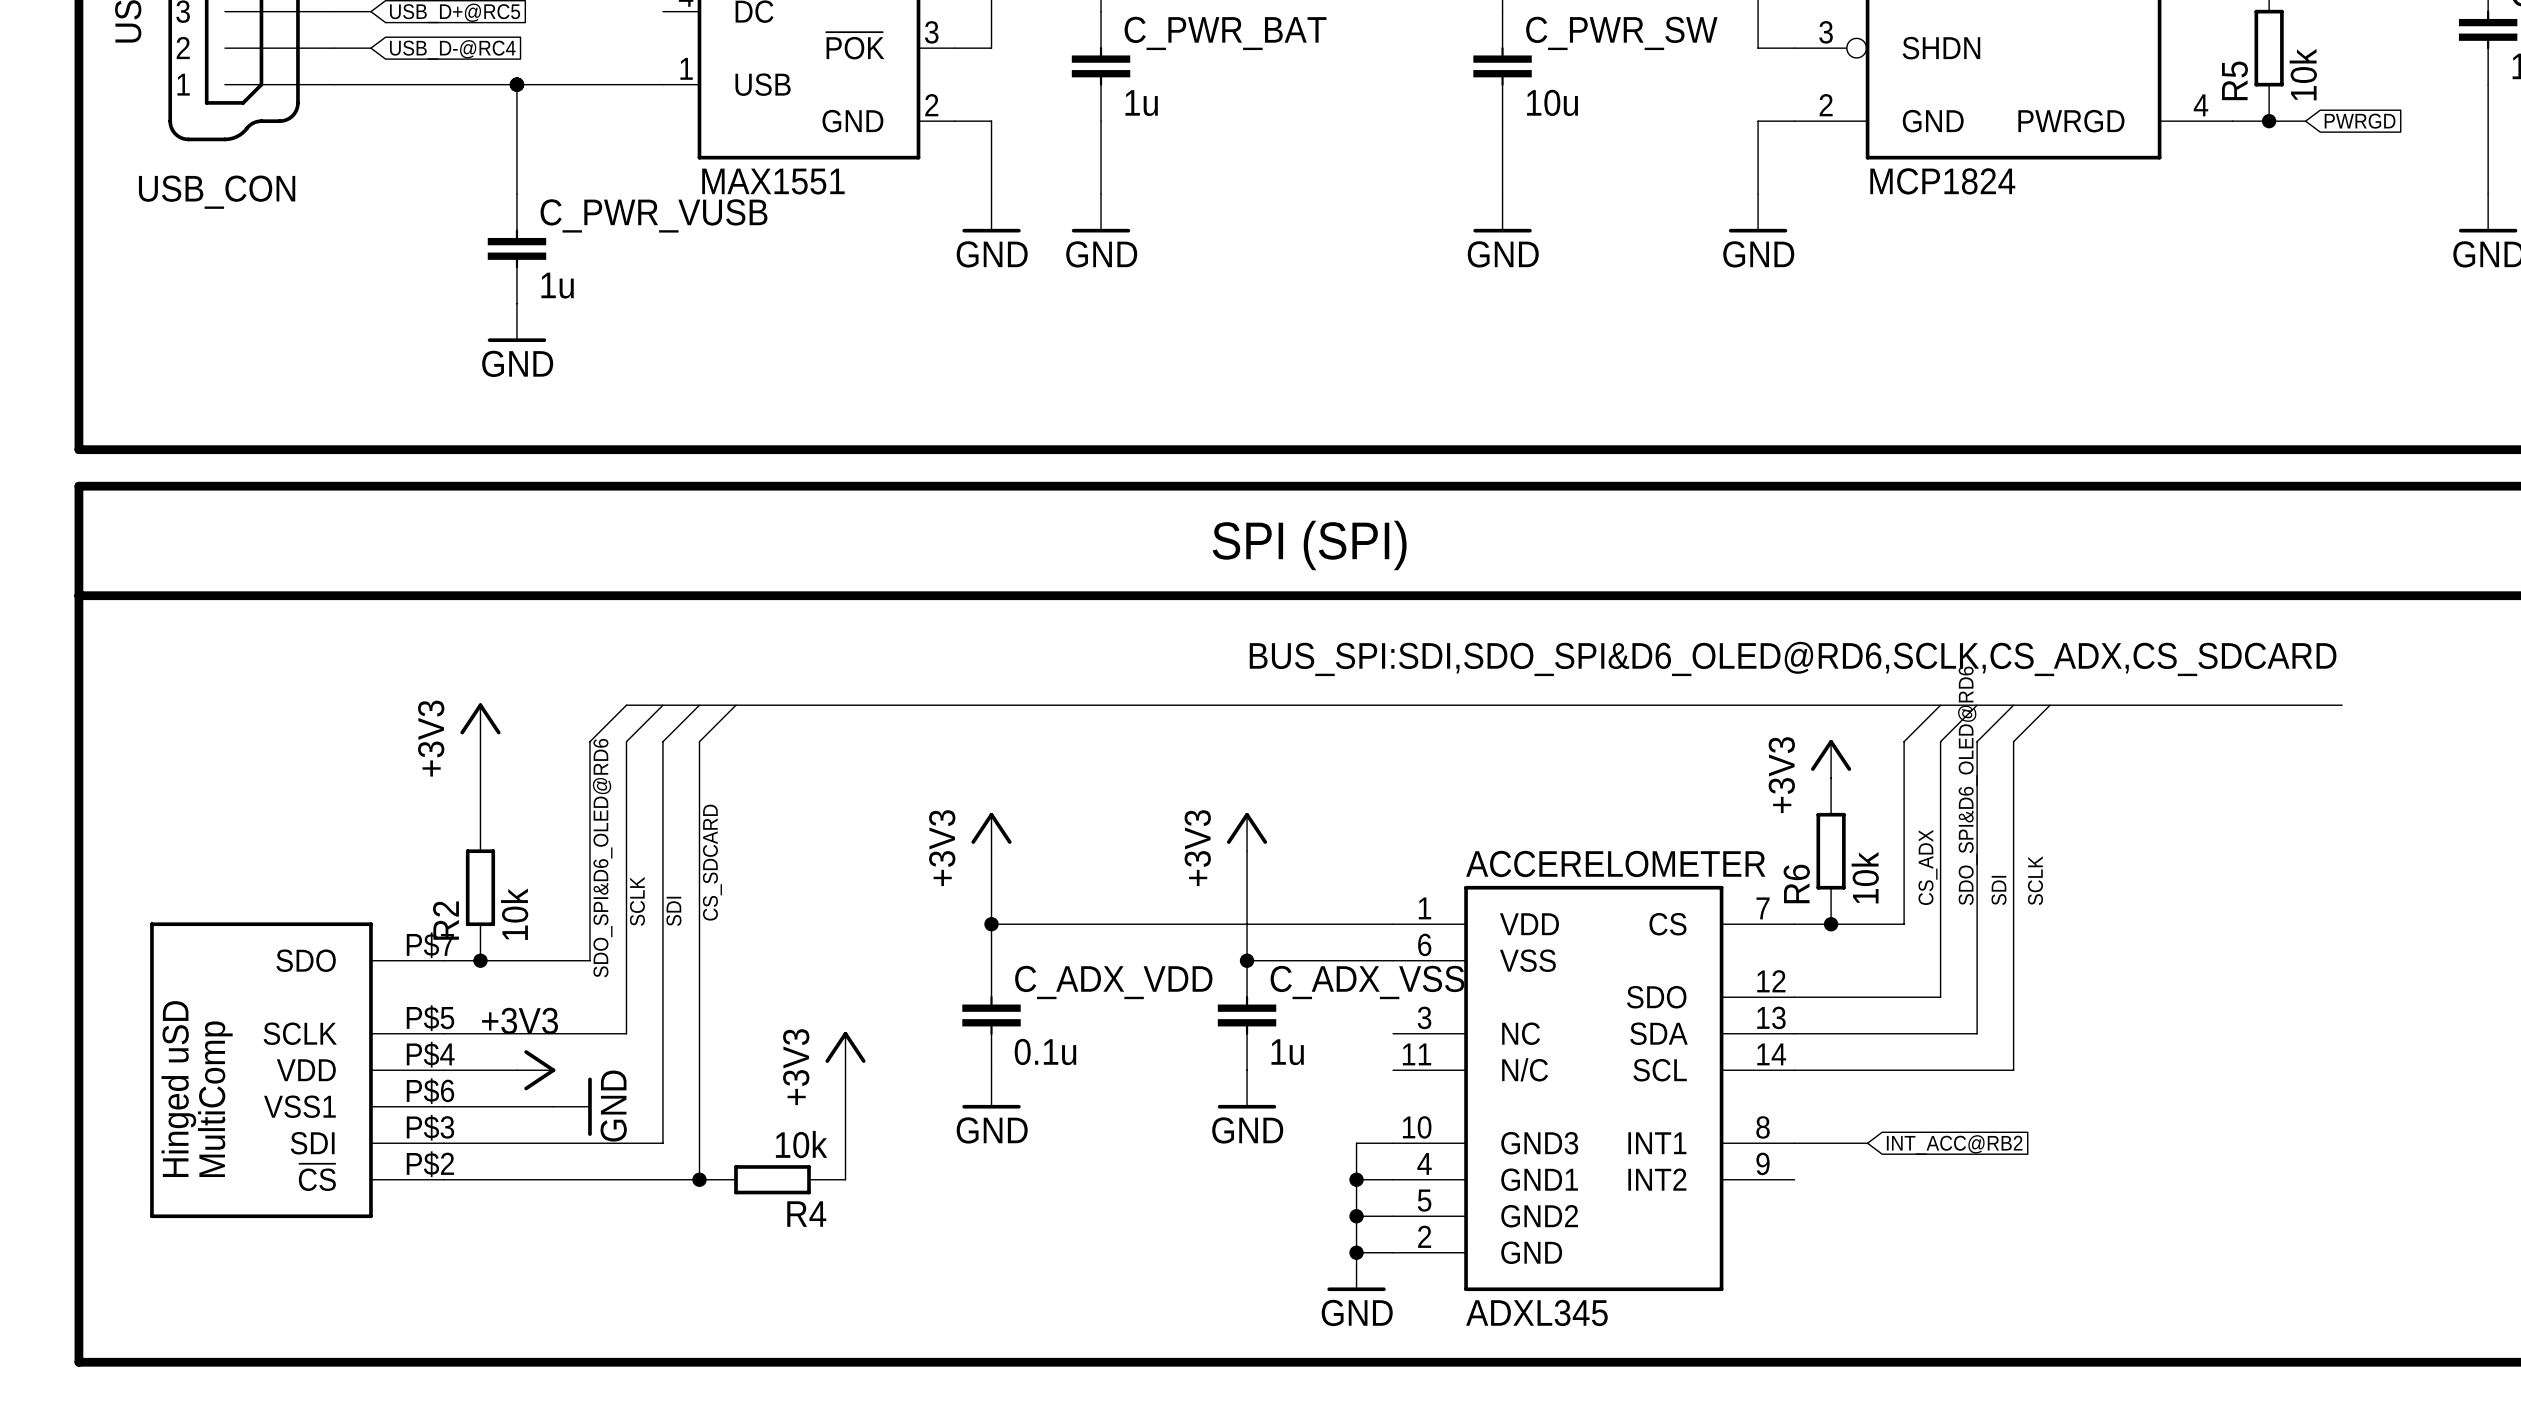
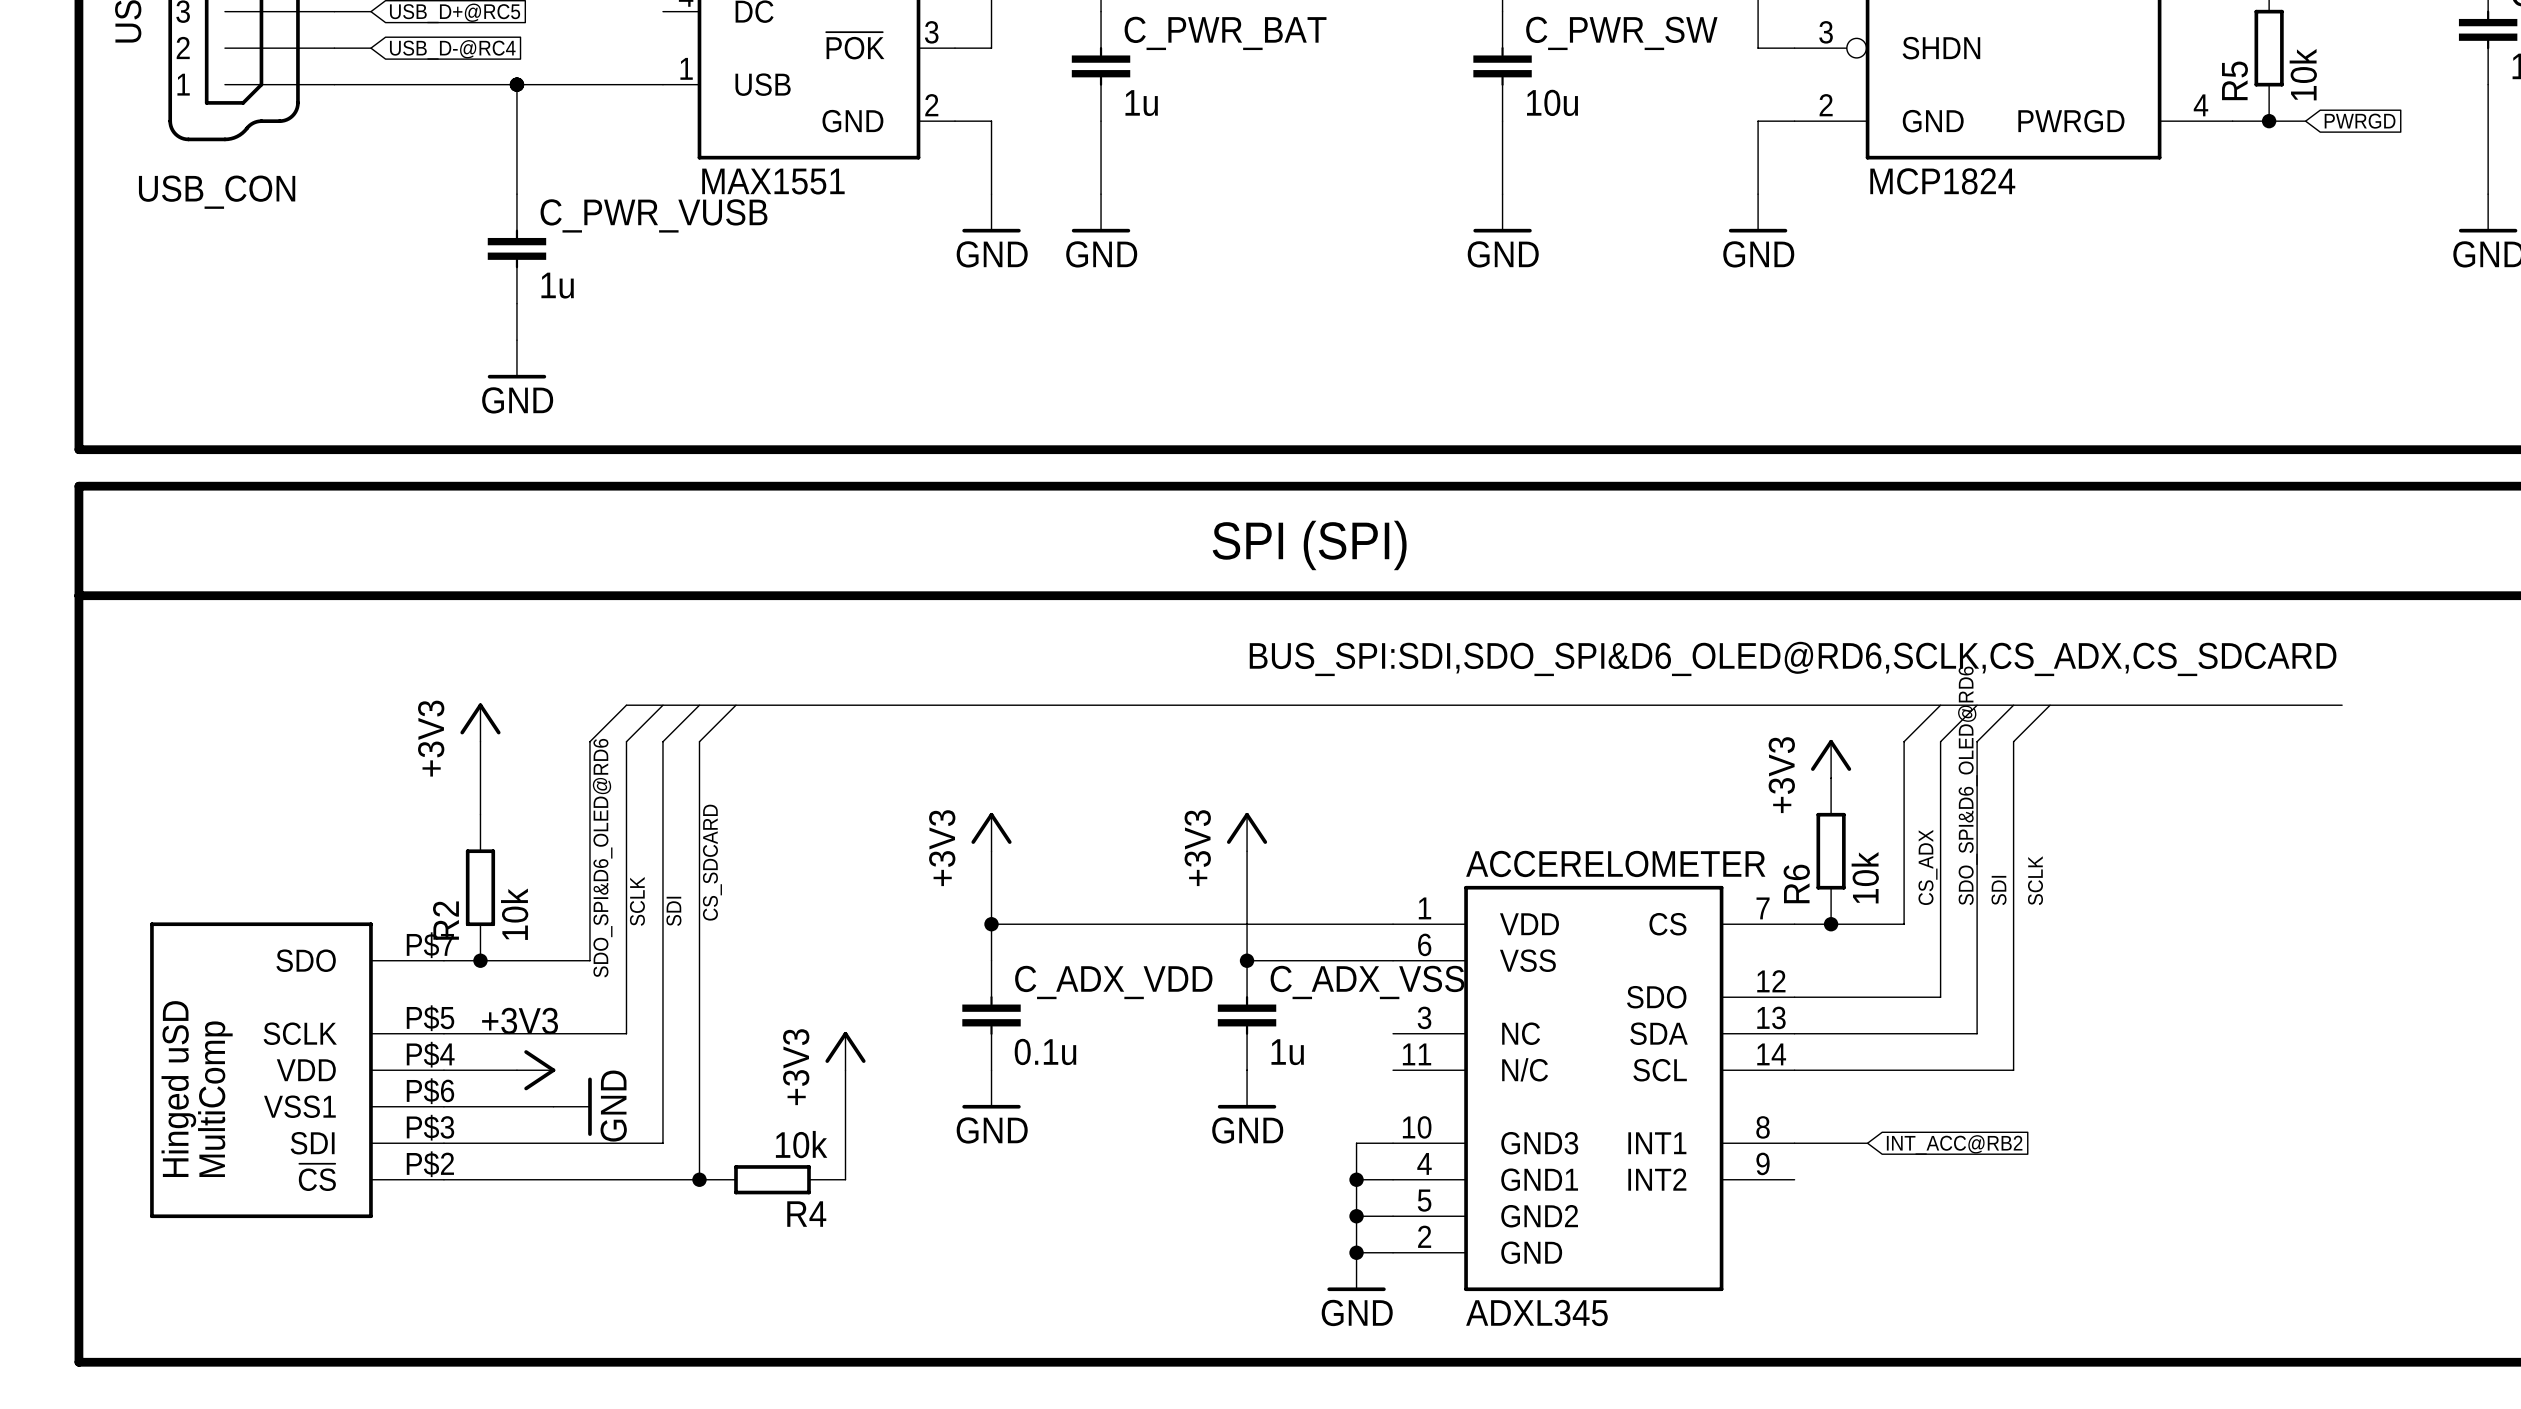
power symbol position: GND (516, 322) -> GND (516, 359)

